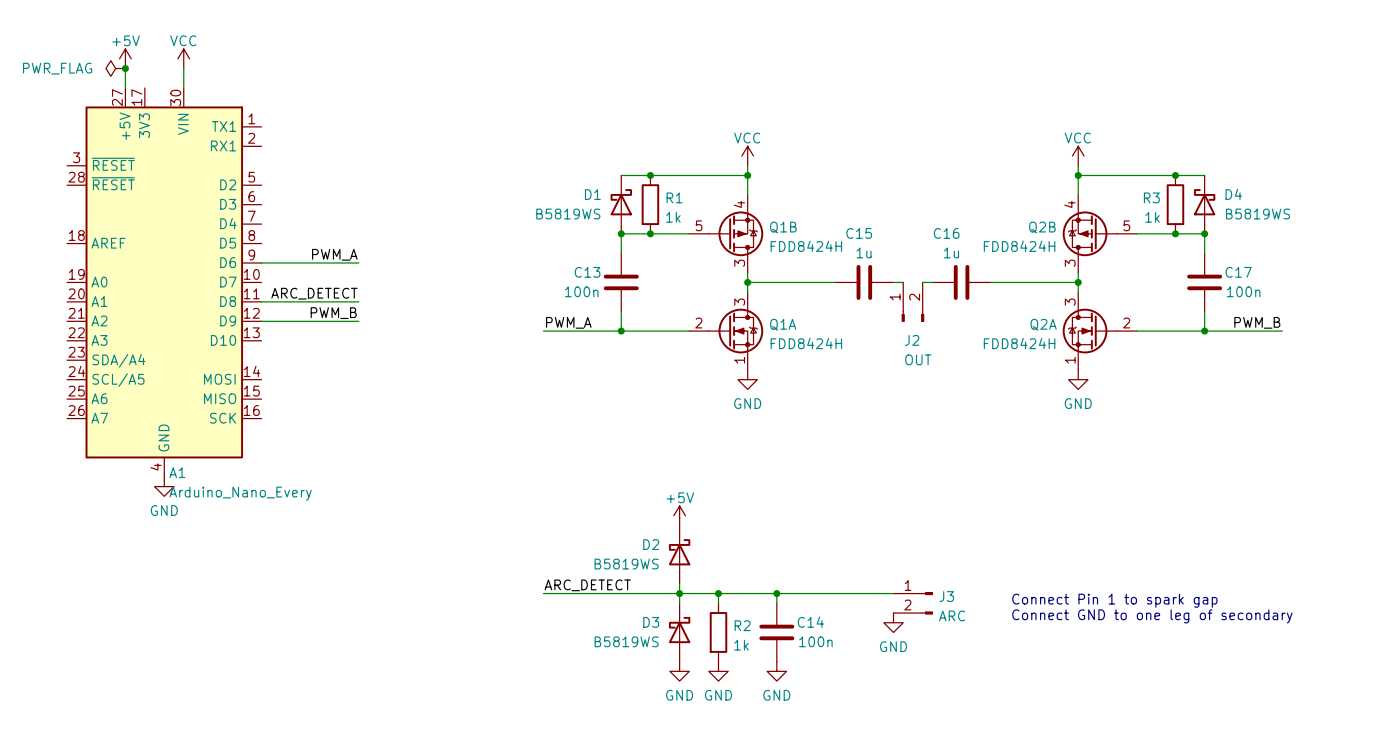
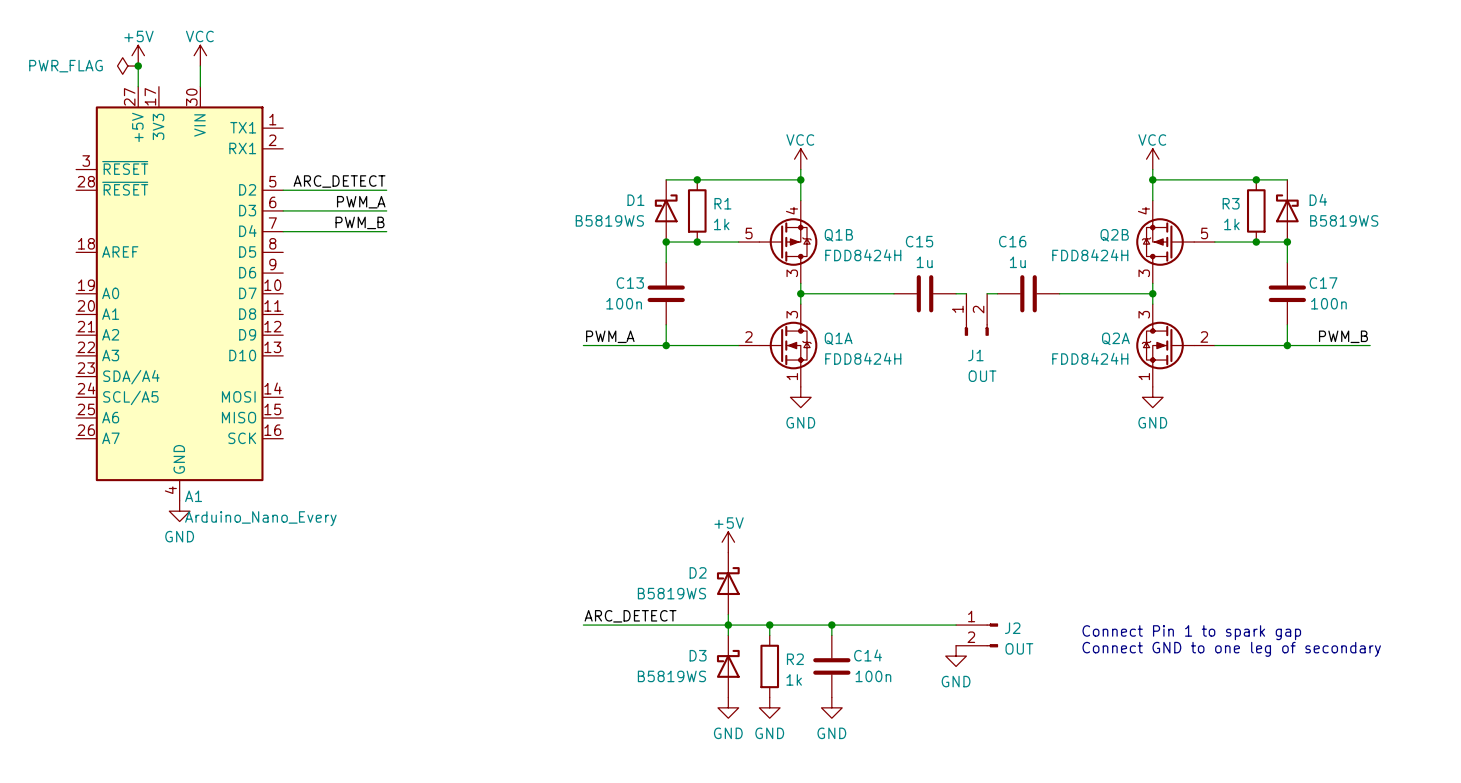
label position: PWM_A (334, 254) -> PWM_A (361, 202)
wire: (261, 262) (358, 262) -> (283, 231) (386, 231)
label position: ARC_DETECT (314, 293) -> ARC_DETECT (339, 181)
wire: (261, 301) (358, 301) -> (283, 210) (386, 210)
label position: PWM_B (333, 313) -> PWM_B (359, 222)
wire: (261, 321) (358, 321) -> (283, 190) (386, 190)
J2 name: J2 (912, 340) -> J1 (975, 355)
J3 name: J3 (946, 596) -> J2 (1012, 628)
J3 value: ARC (952, 615) -> OUT (1019, 648)

